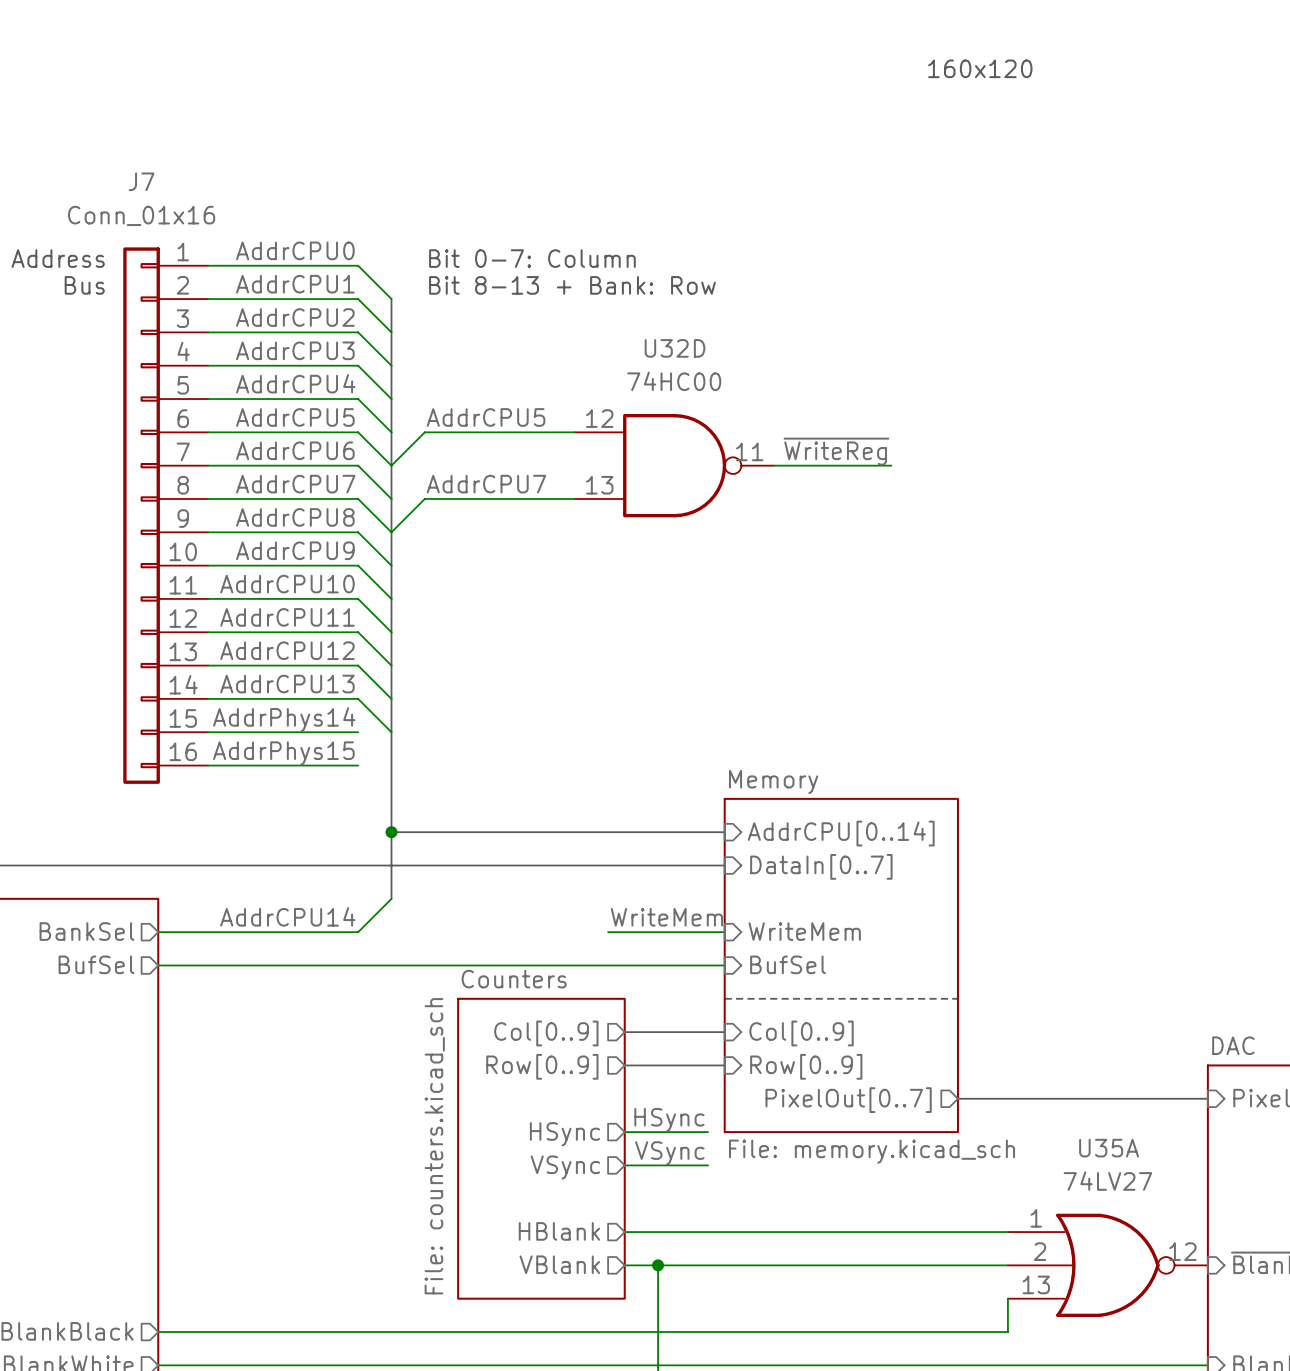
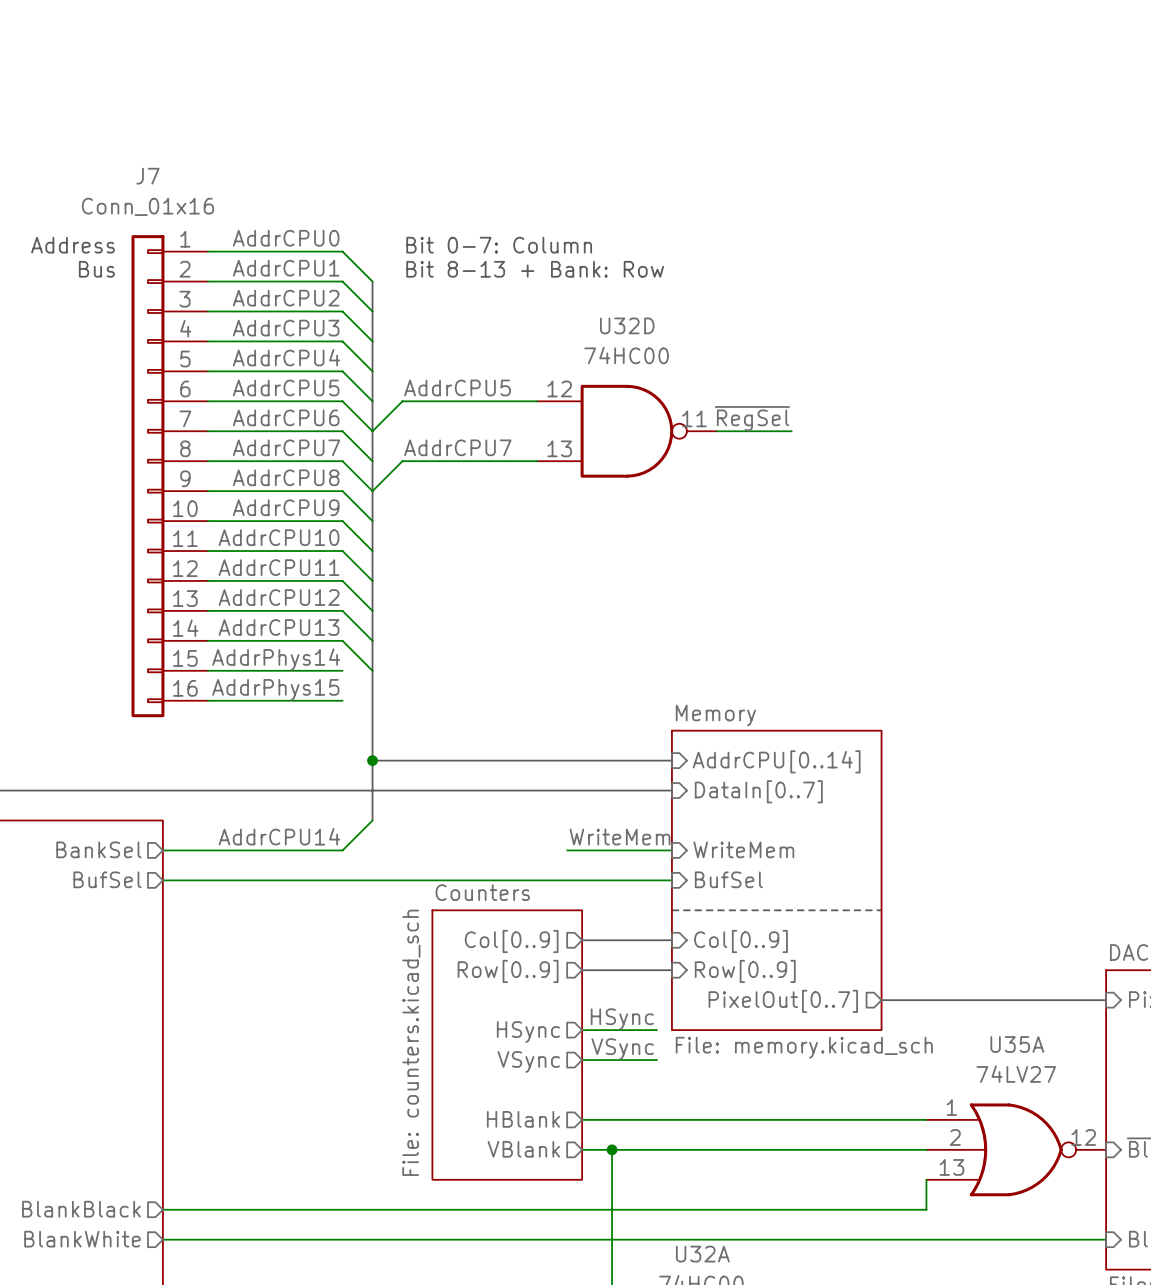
text: 160x120 (980, 68) -> none
label: none -> ~{RegSel} (752, 418)
label: ~{WriteReg} (836, 451) -> none
wire: (857, 465) (891, 465) -> none

